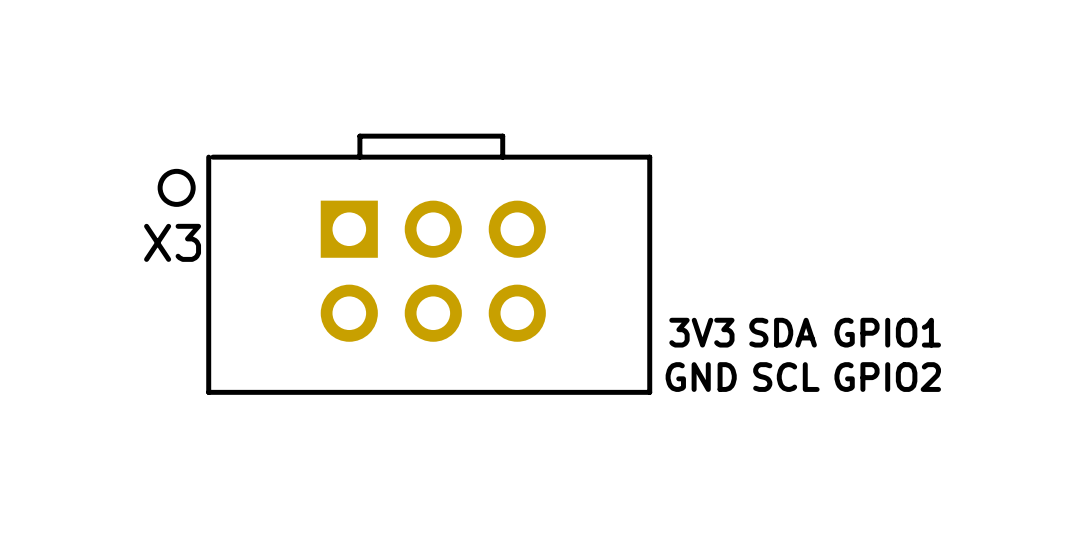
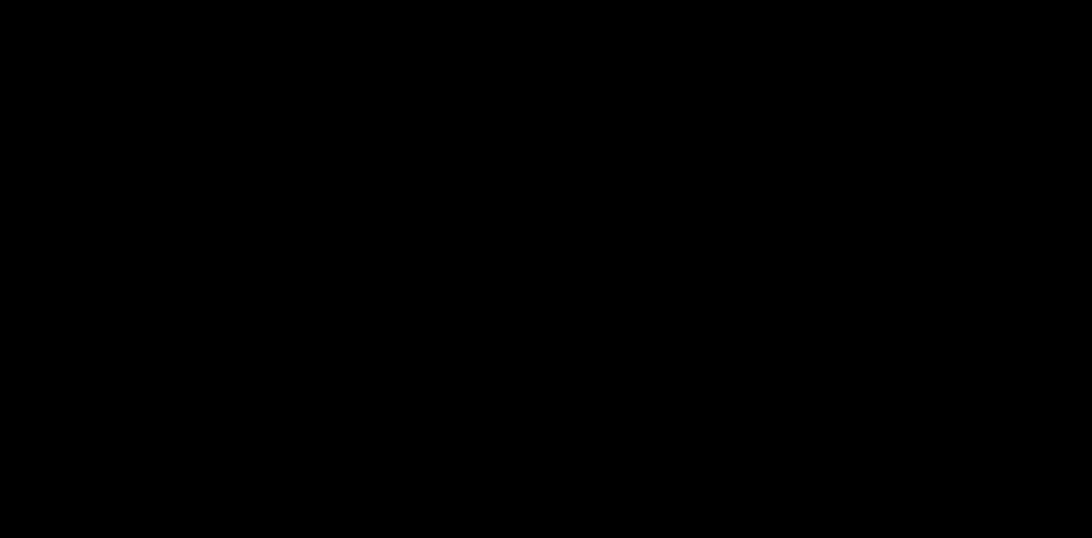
X3: (404, 264) -> none

